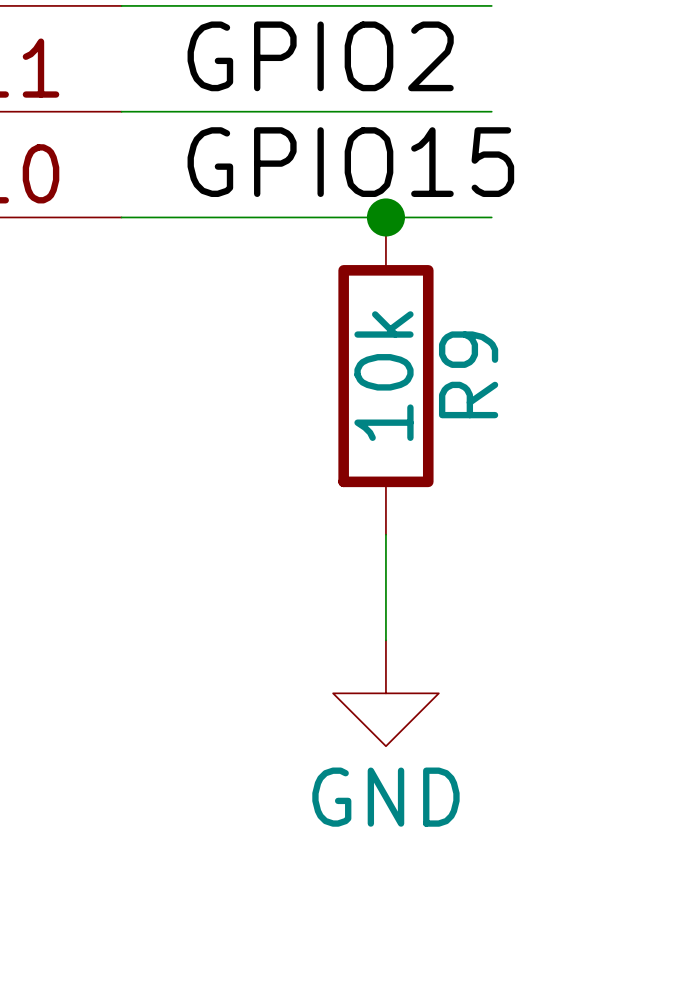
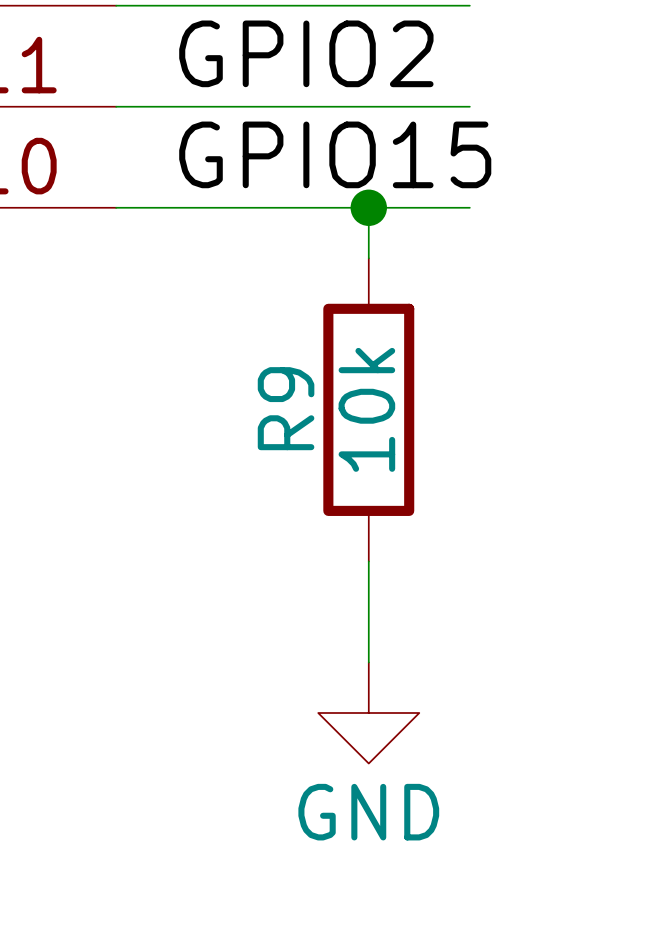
R9 name position: R9 (468, 374) -> R9 (286, 408)
R9 position: (385, 376) -> (368, 409)
power symbol position: GND (385, 693) -> GND (368, 713)

